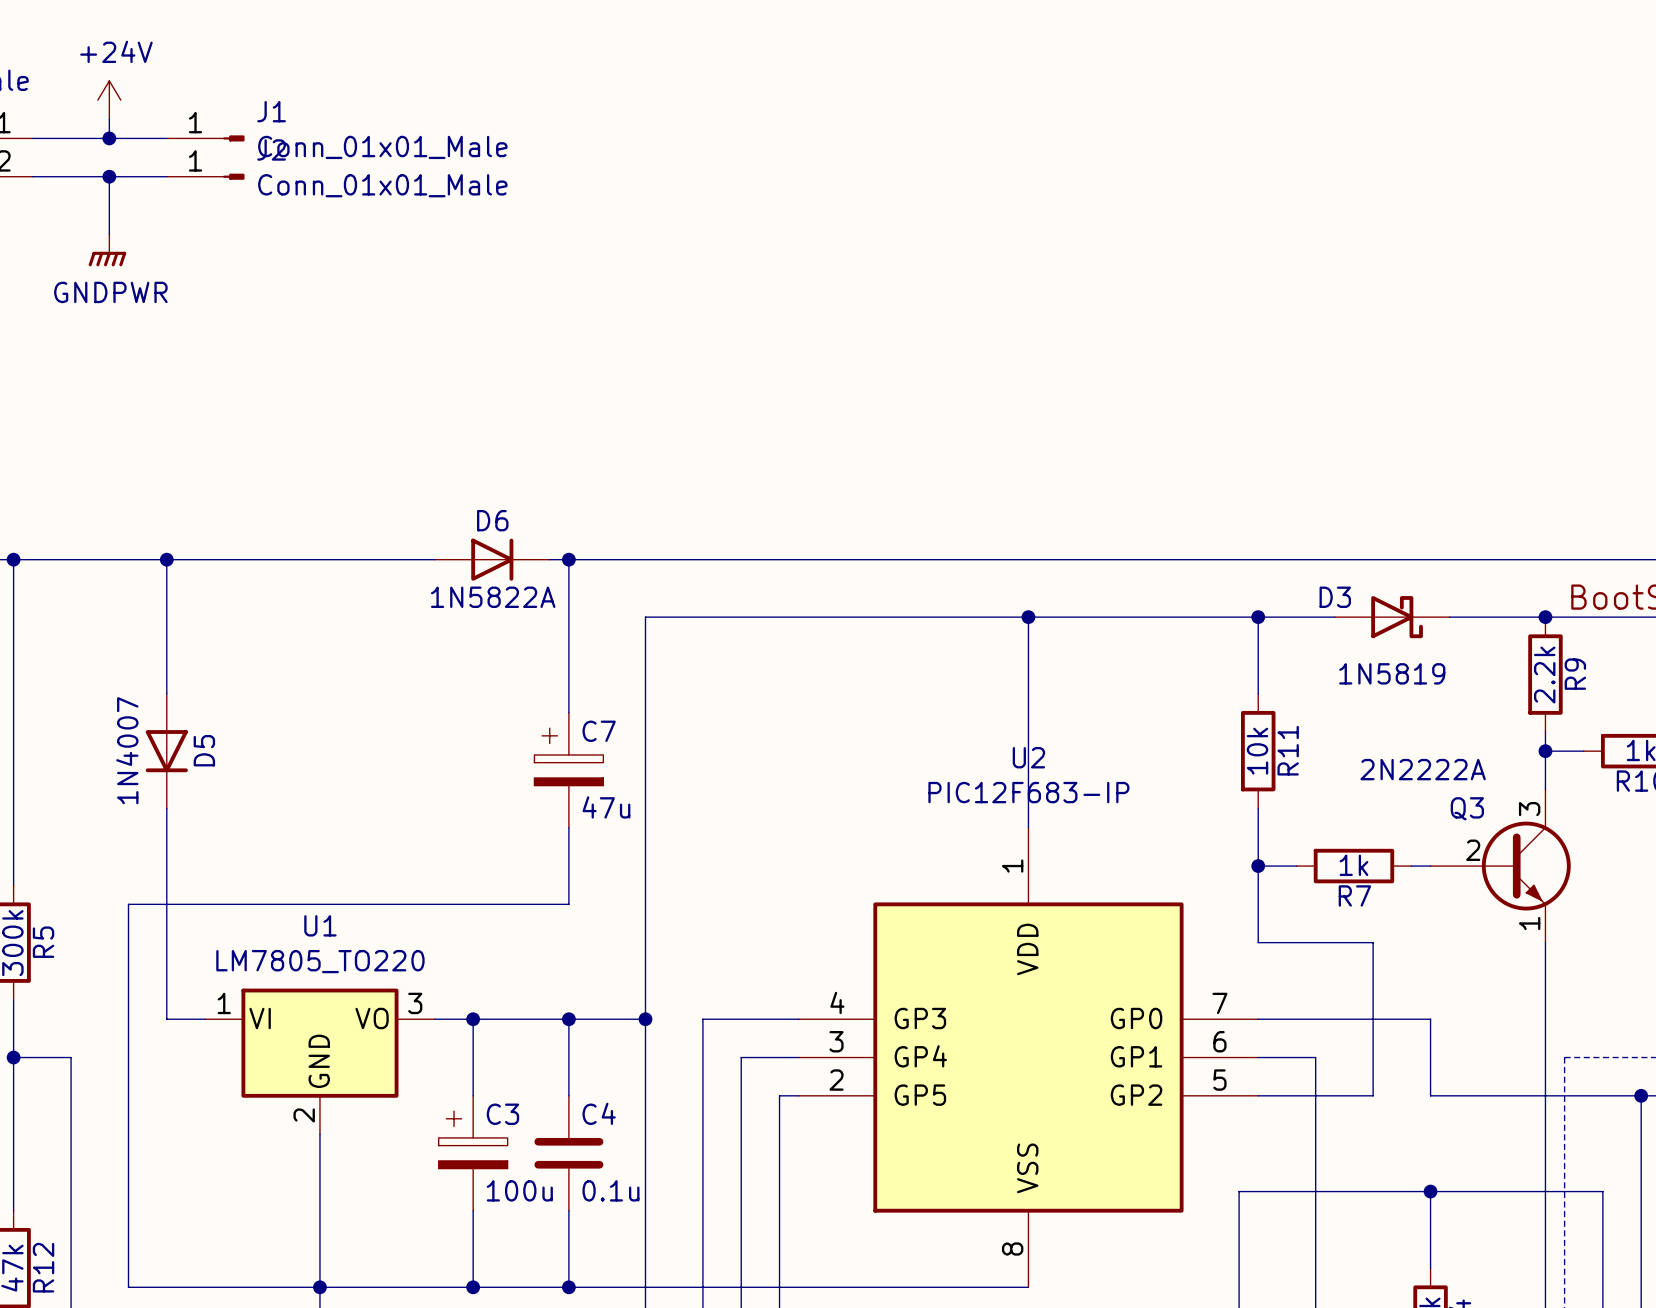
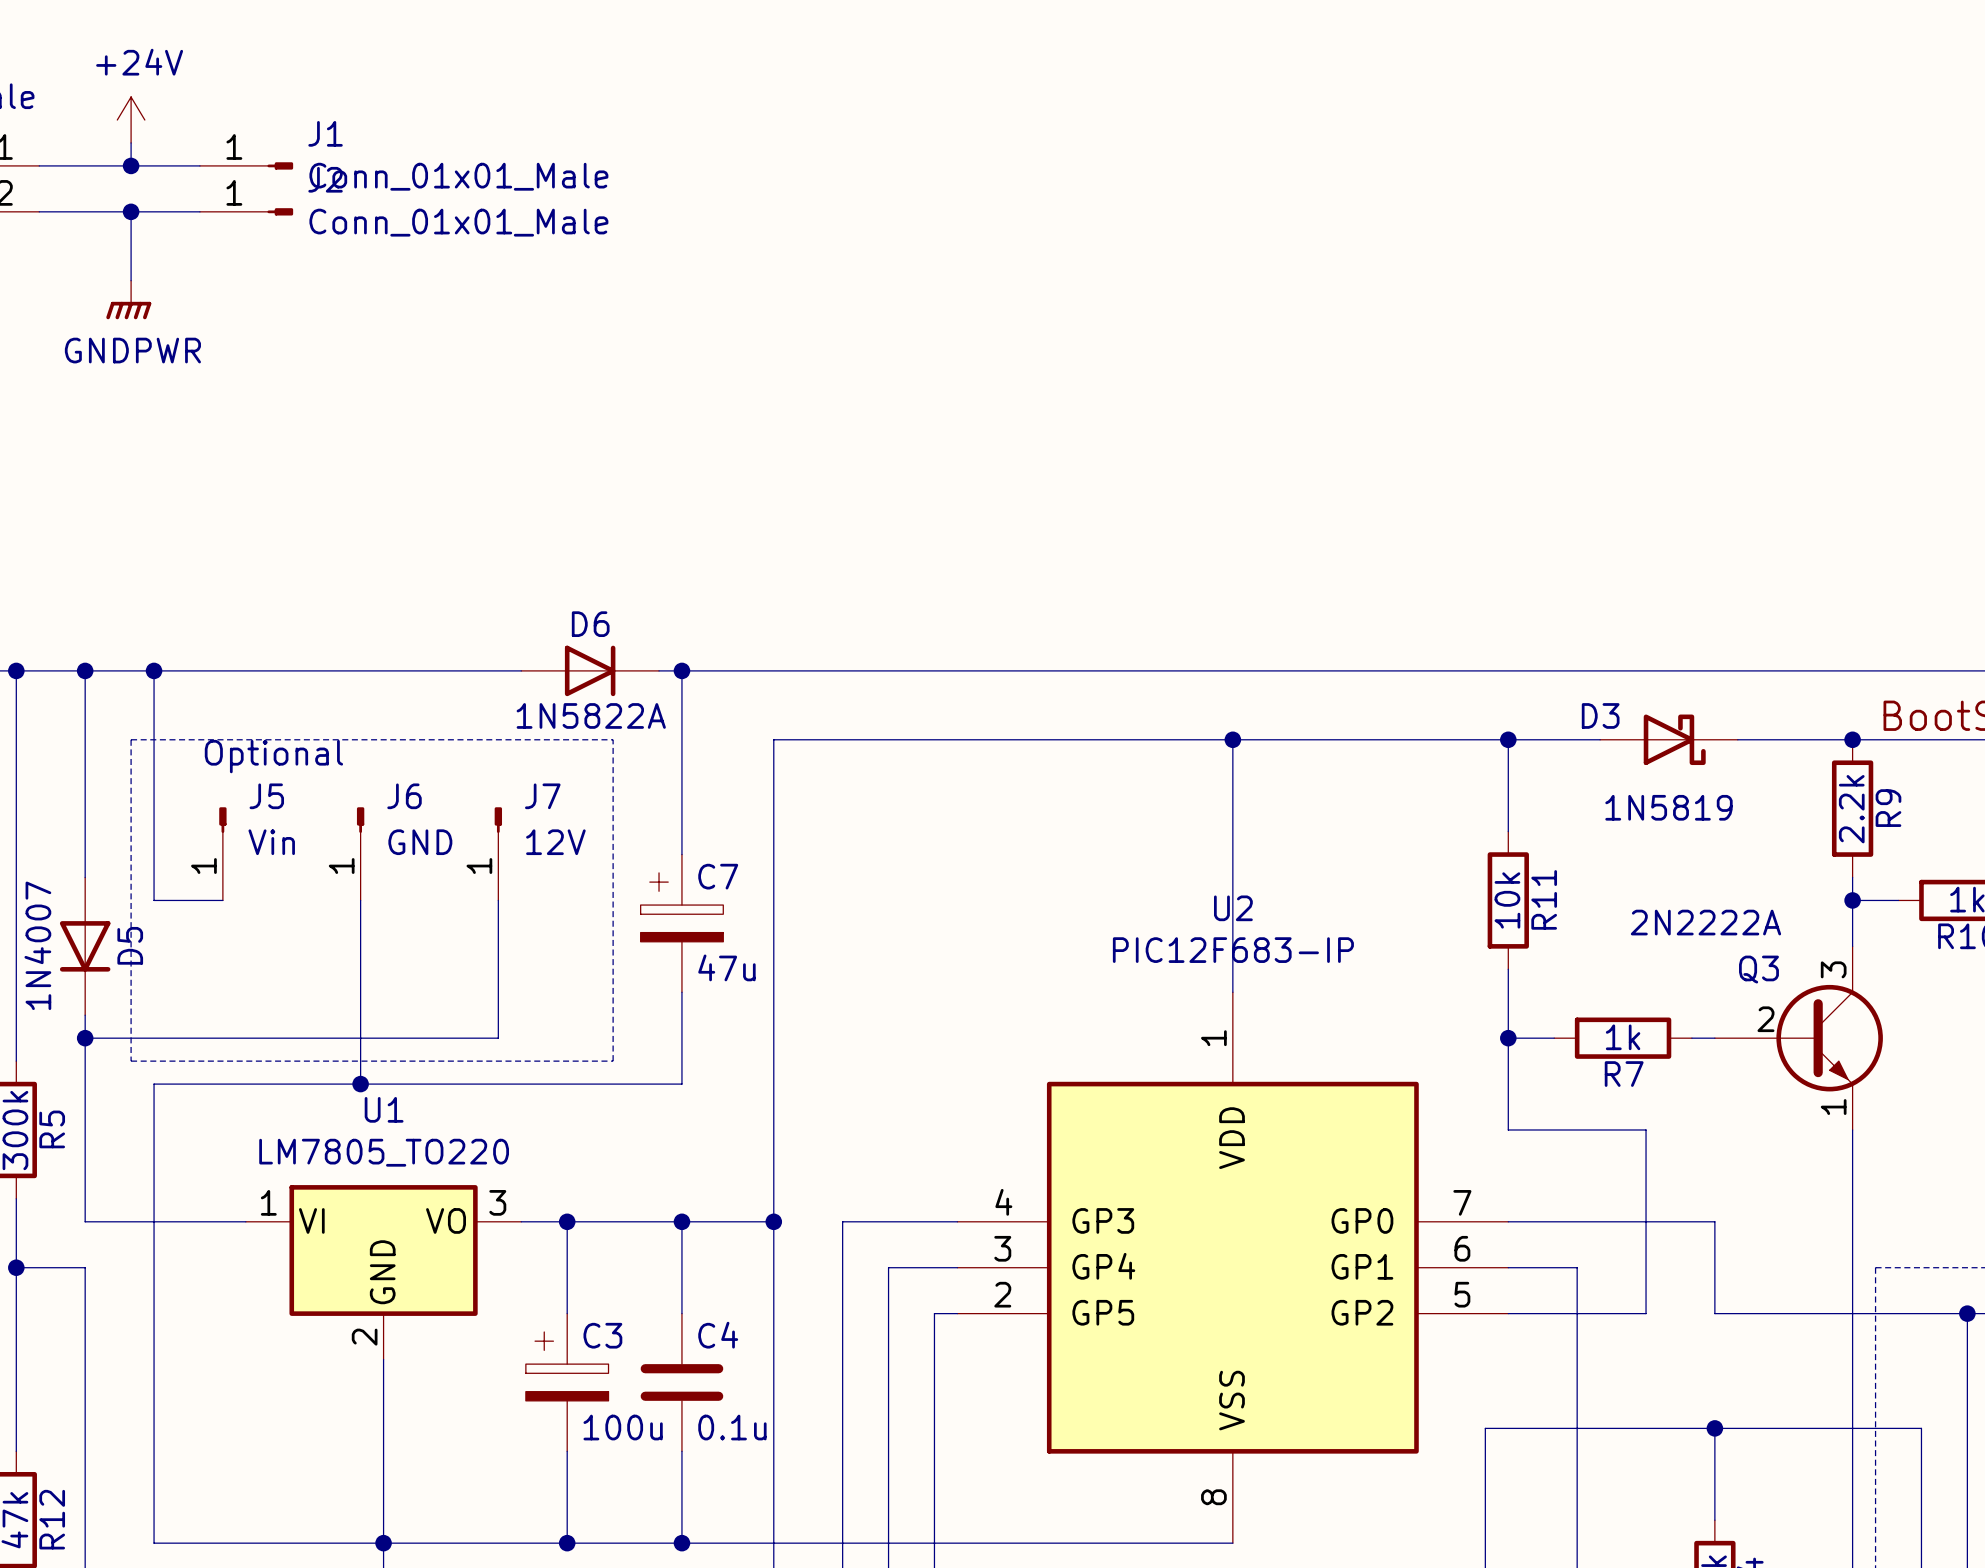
wire: none -> (85, 670) (85, 877)
junction: none -> (85, 670)
wire: none -> (154, 670) (154, 900) (222, 900)
wire: (166, 559) (166, 693) -> none
junction position: (166, 559) -> (154, 670)
line: none -> (131, 739) (131, 1061) (613, 1061) (613, 739) (131, 739)
text: none -> Optional (273, 756)
J5: none -> Vin (222, 853)
J6: none -> GND (360, 853)
J7: none -> 12V (498, 853)
D5 position: (166, 751) -> (85, 946)
wire: none -> (360, 900) (360, 1084)
wire: none -> (498, 900) (498, 1038) (85, 1038)
wire: (166, 808) (166, 1019) -> (85, 1015) (85, 1221) (199, 1221)
junction: none -> (85, 1038)
junction: none -> (360, 1084)

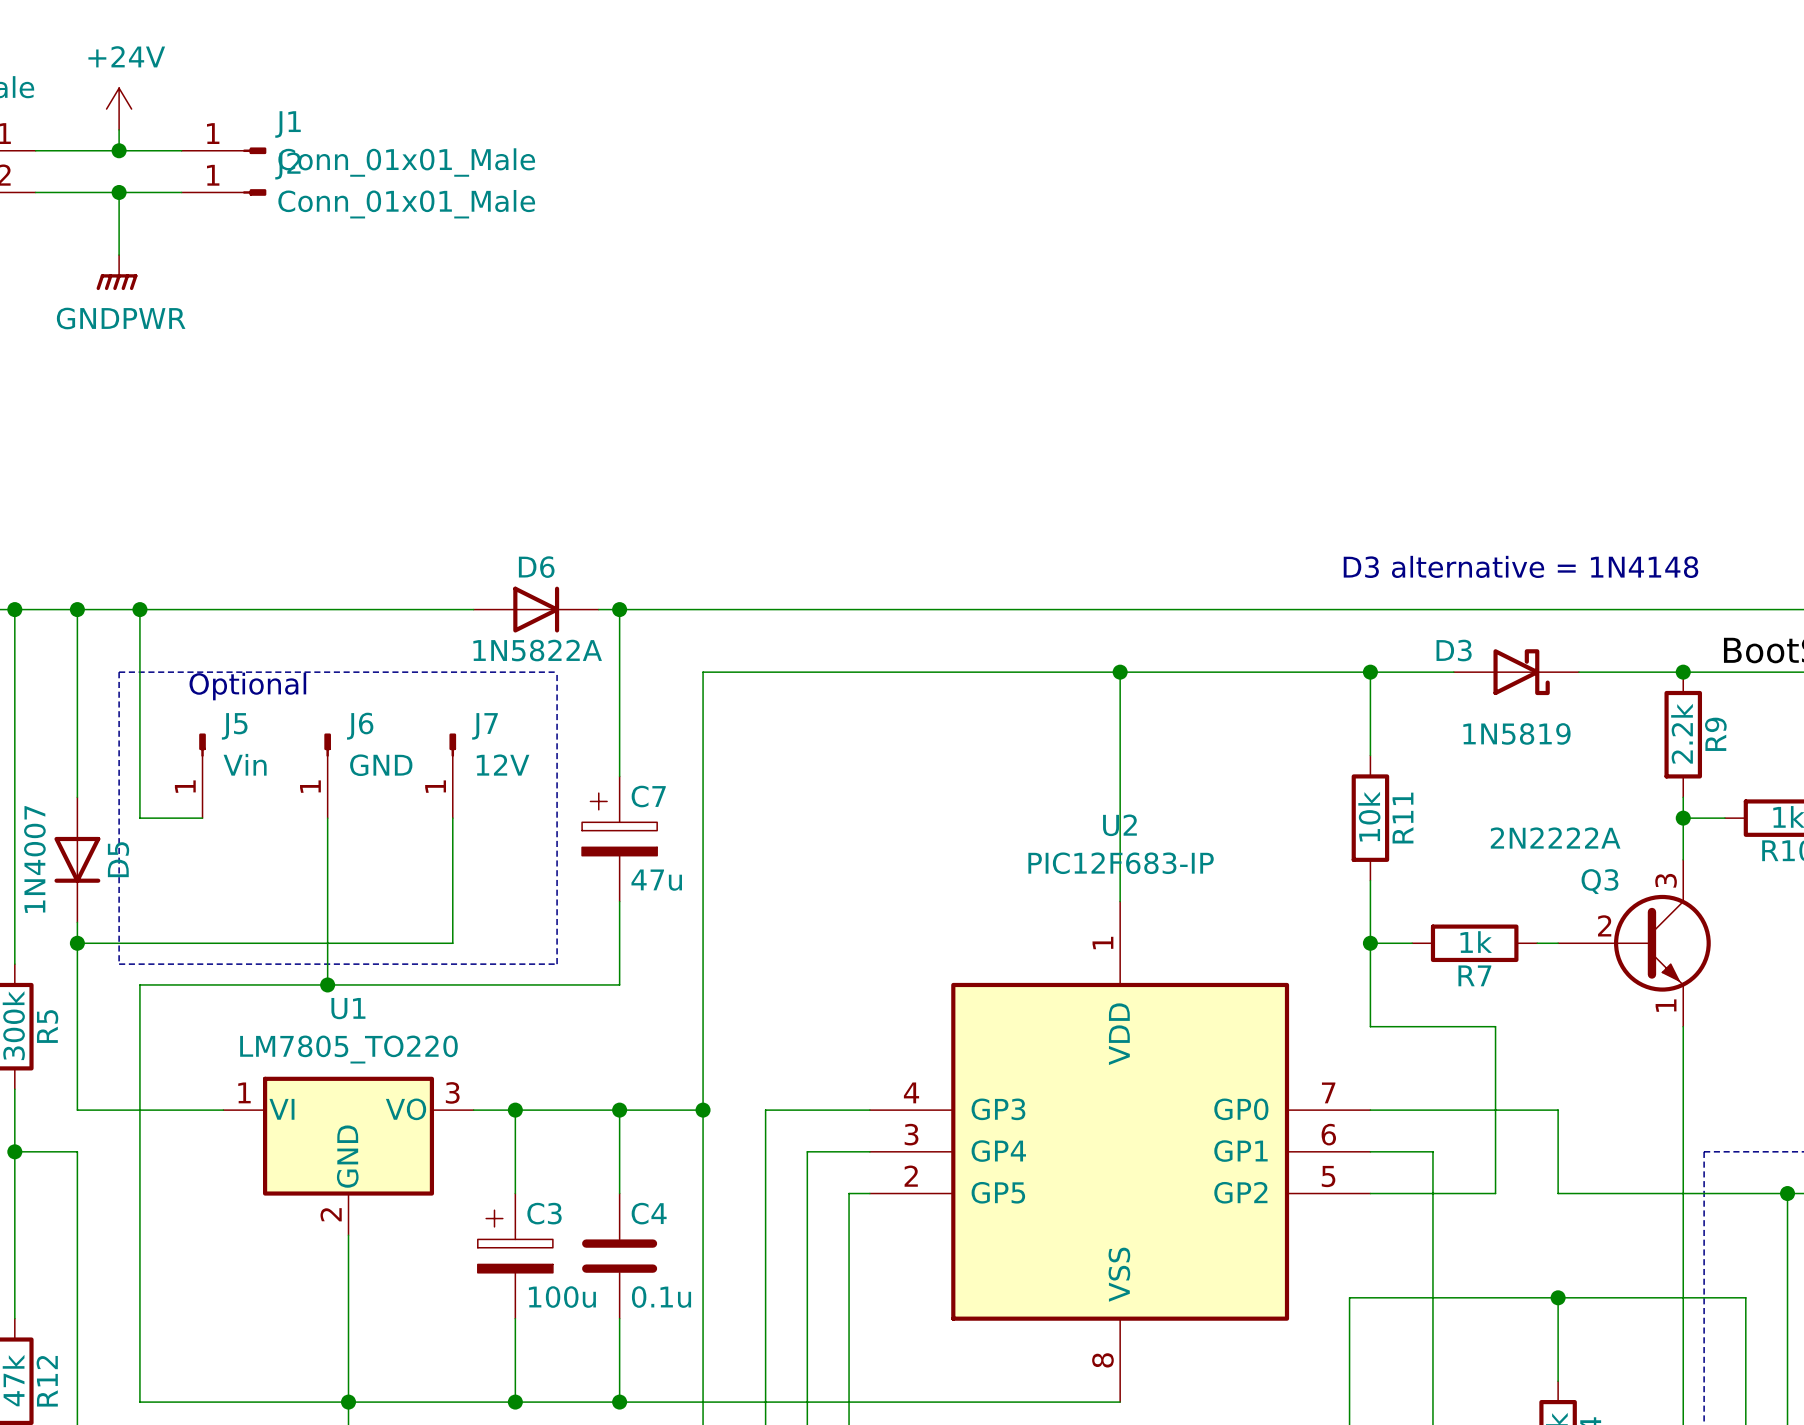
text: none -> D3 alternative = 1N4148 (1520, 566)

